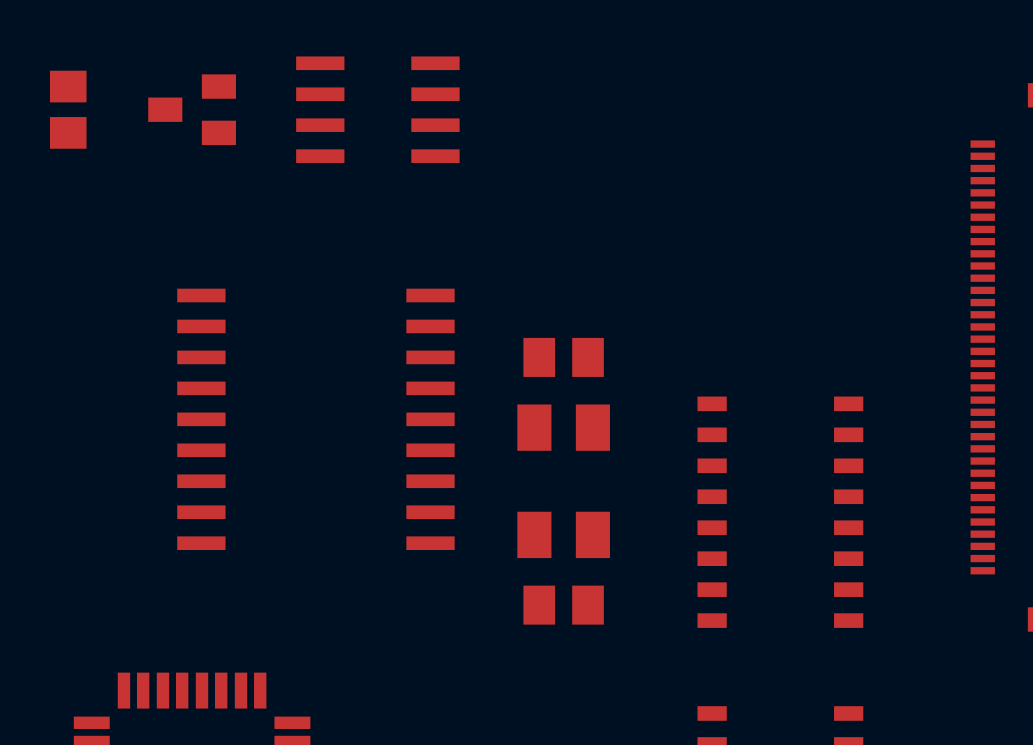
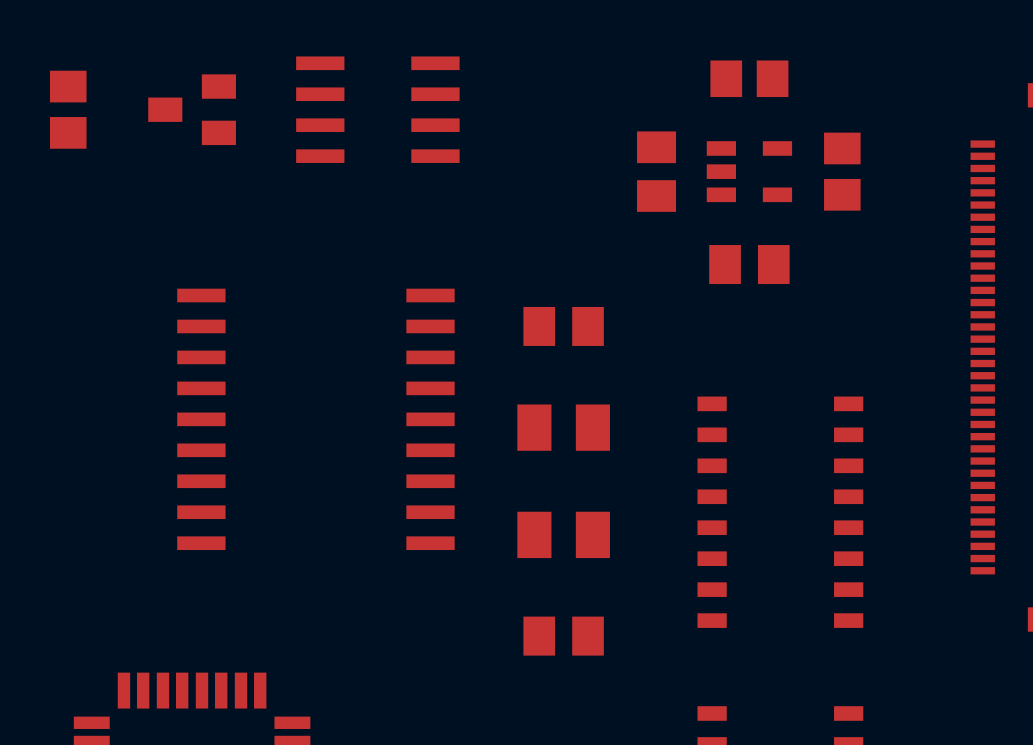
part: none -> (749, 78)
part: none -> (656, 171)
part: none -> (749, 171)
part: none -> (842, 171)
part: none -> (749, 264)
part position: (563, 357) -> (563, 326)
part position: (563, 605) -> (563, 636)

